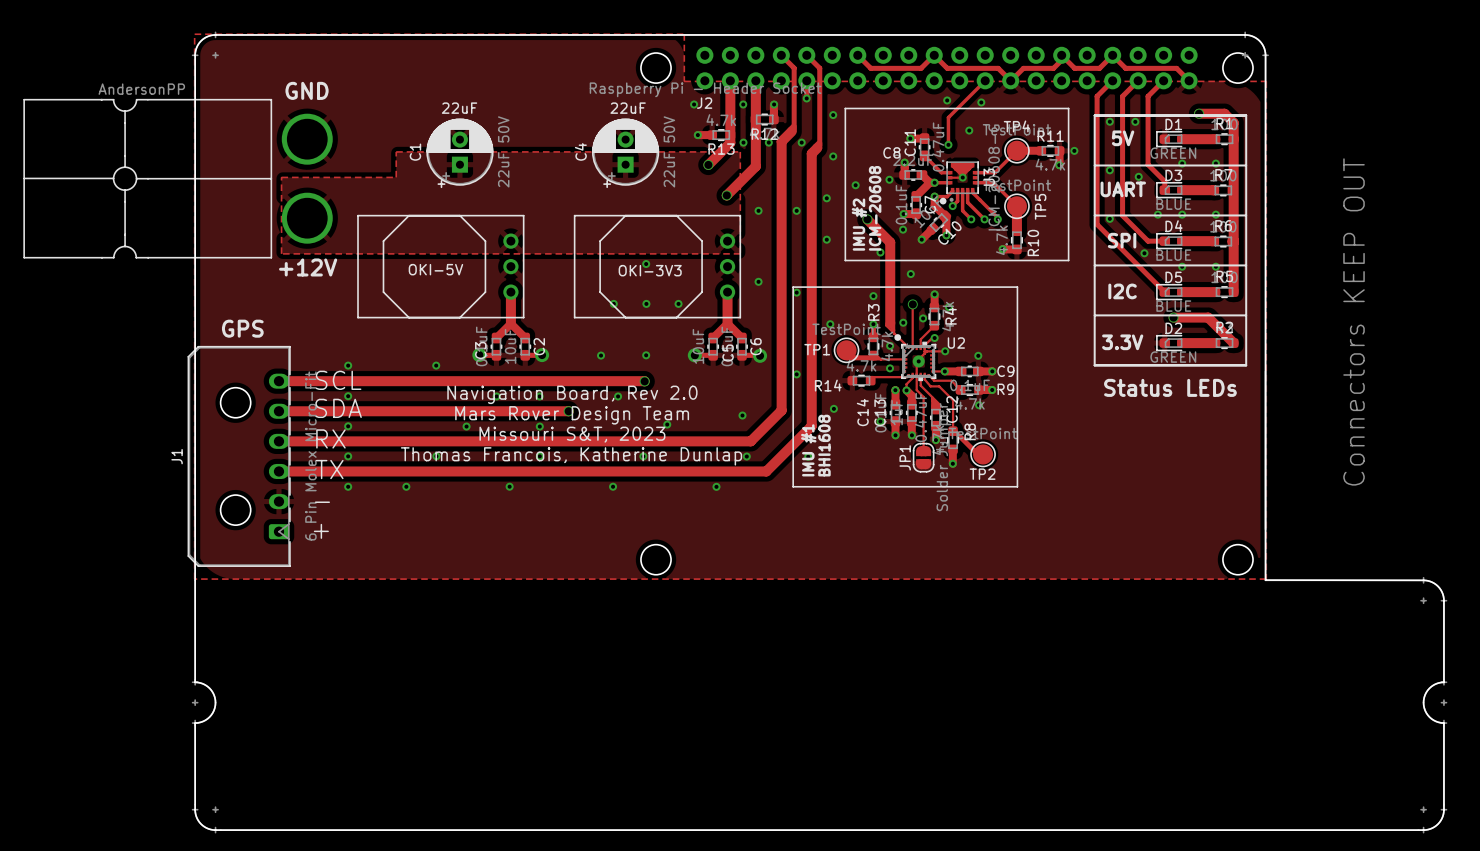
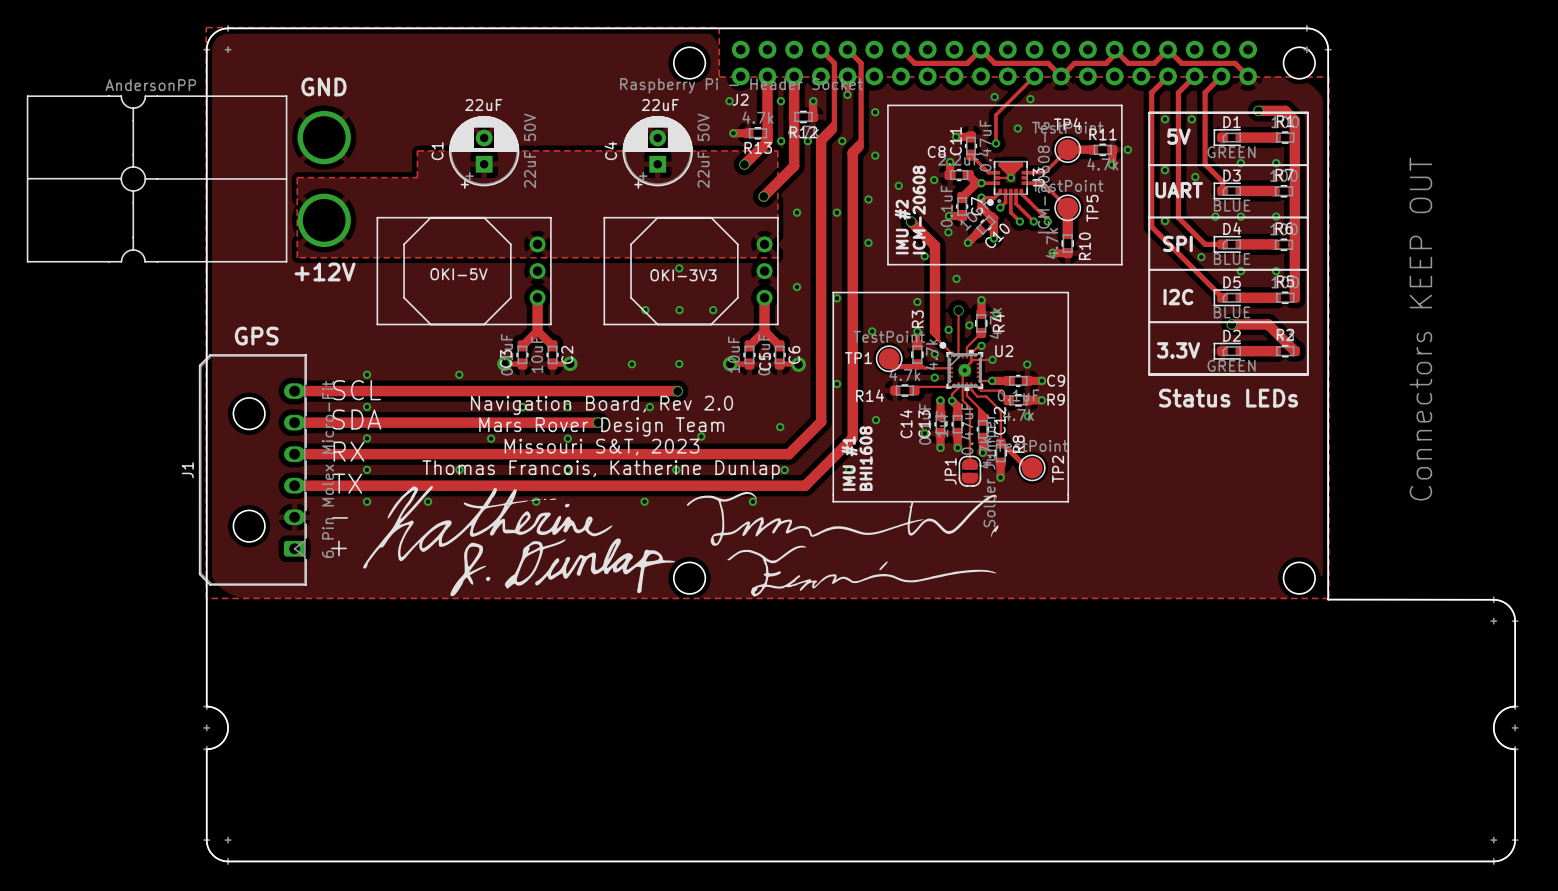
drawing: none -> [363, 485, 999, 597]
TP2 name rotation: 0° (982, 474) -> 90° counterclockwise (1058, 469)

